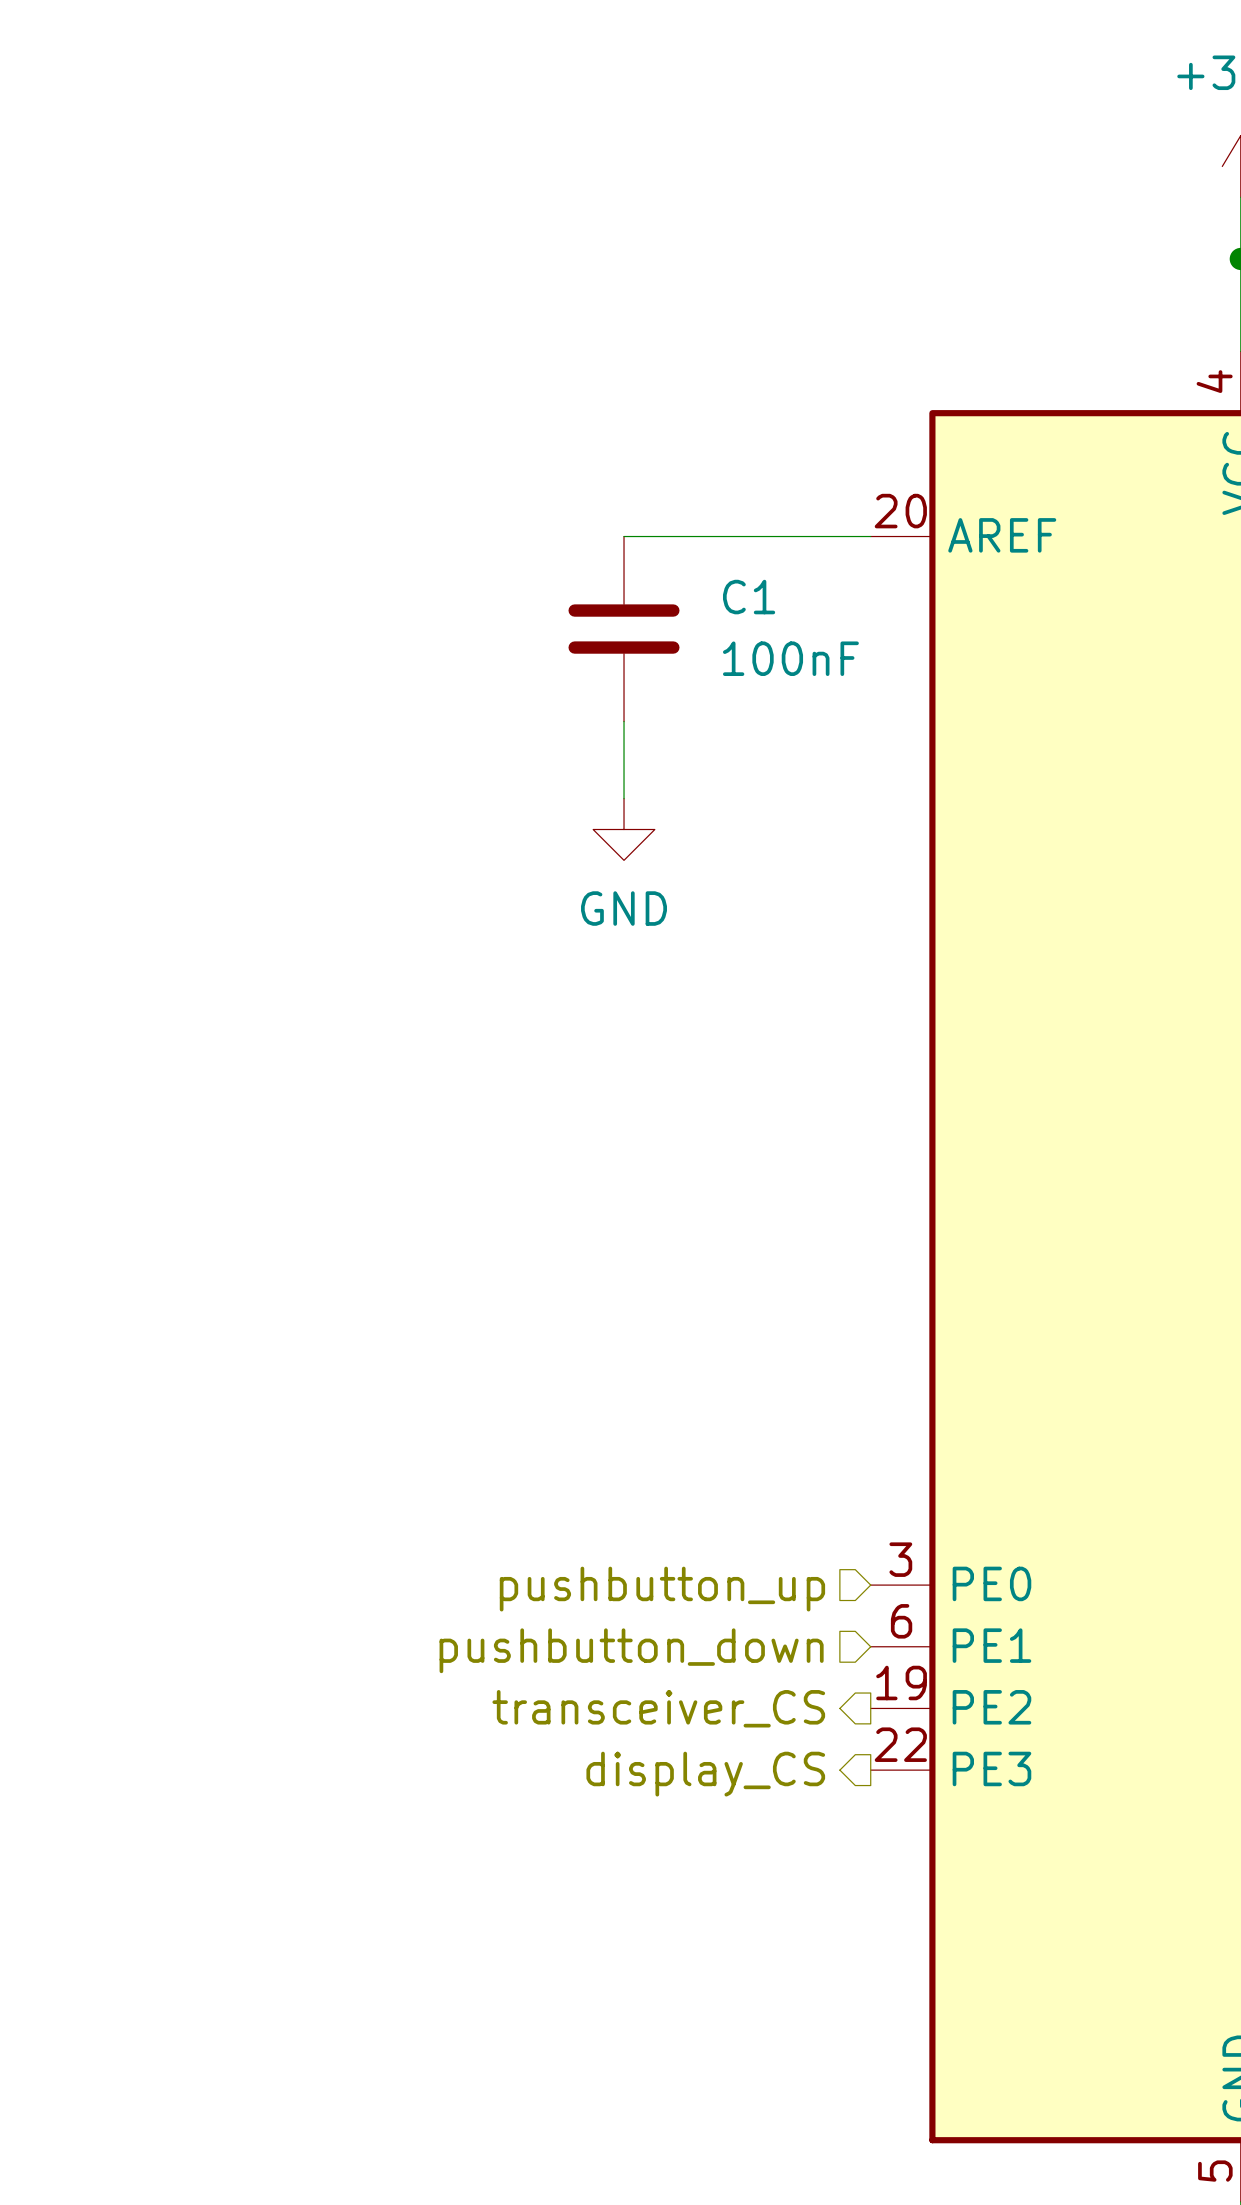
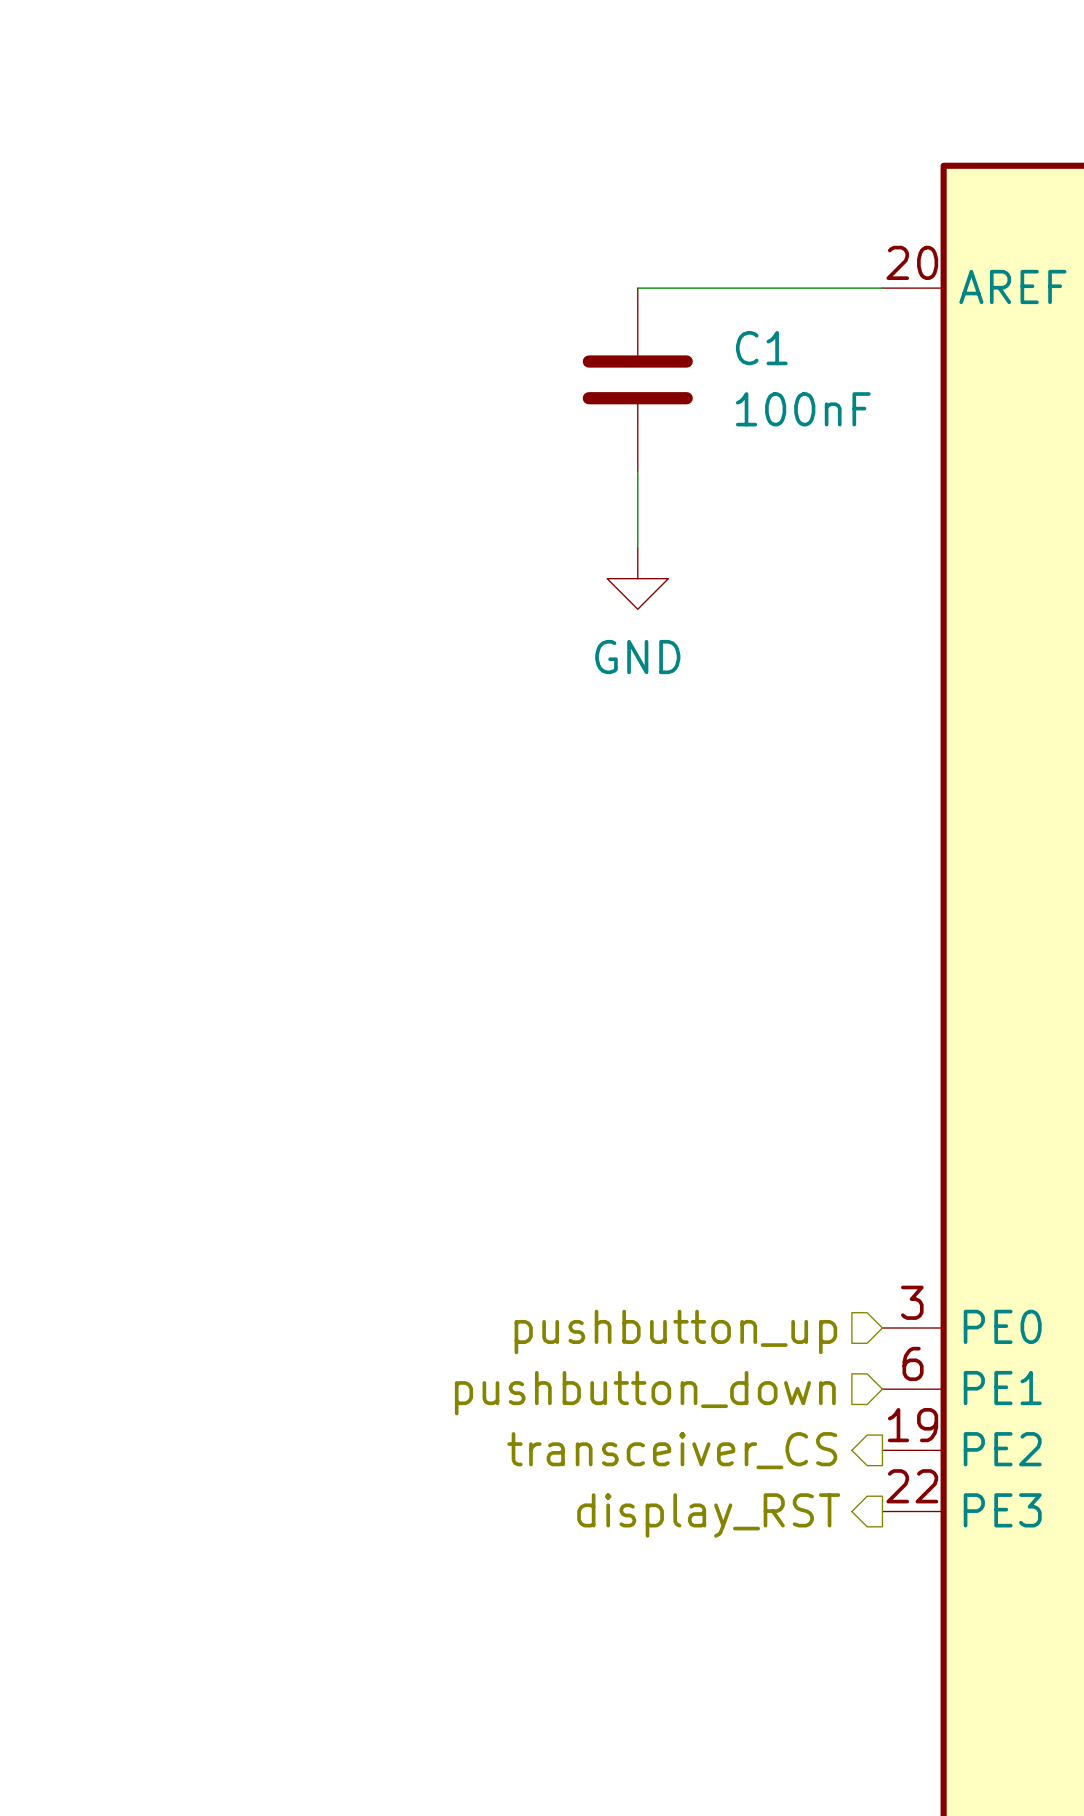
hierarchical label: display_CS (705, 1774) -> display_RST (708, 1515)

